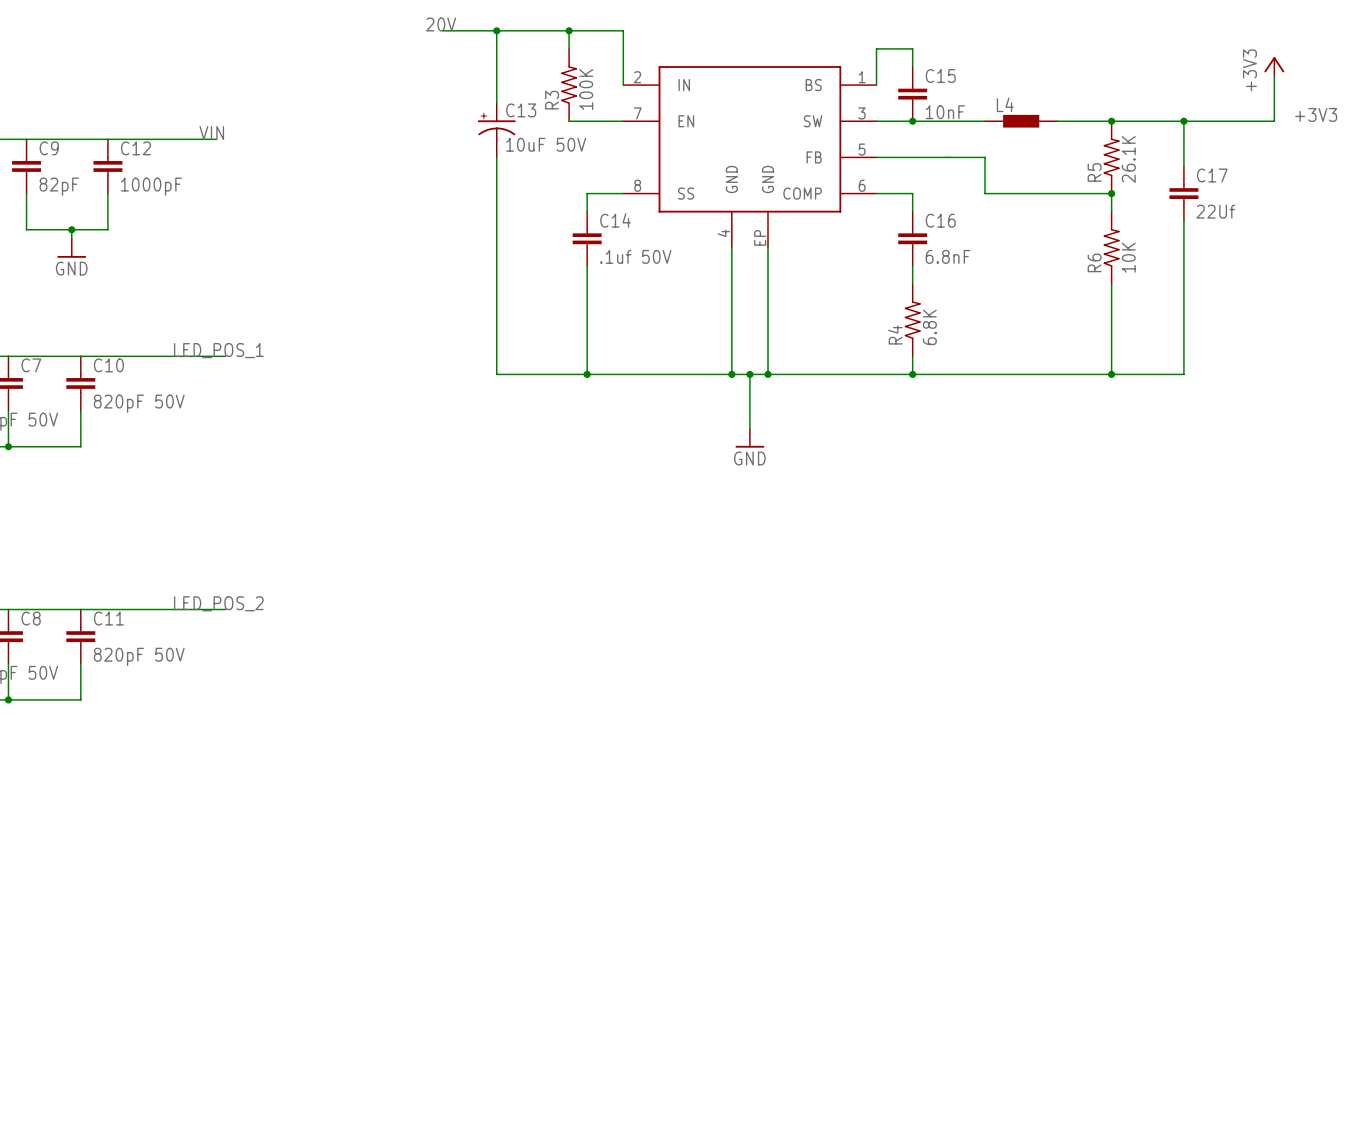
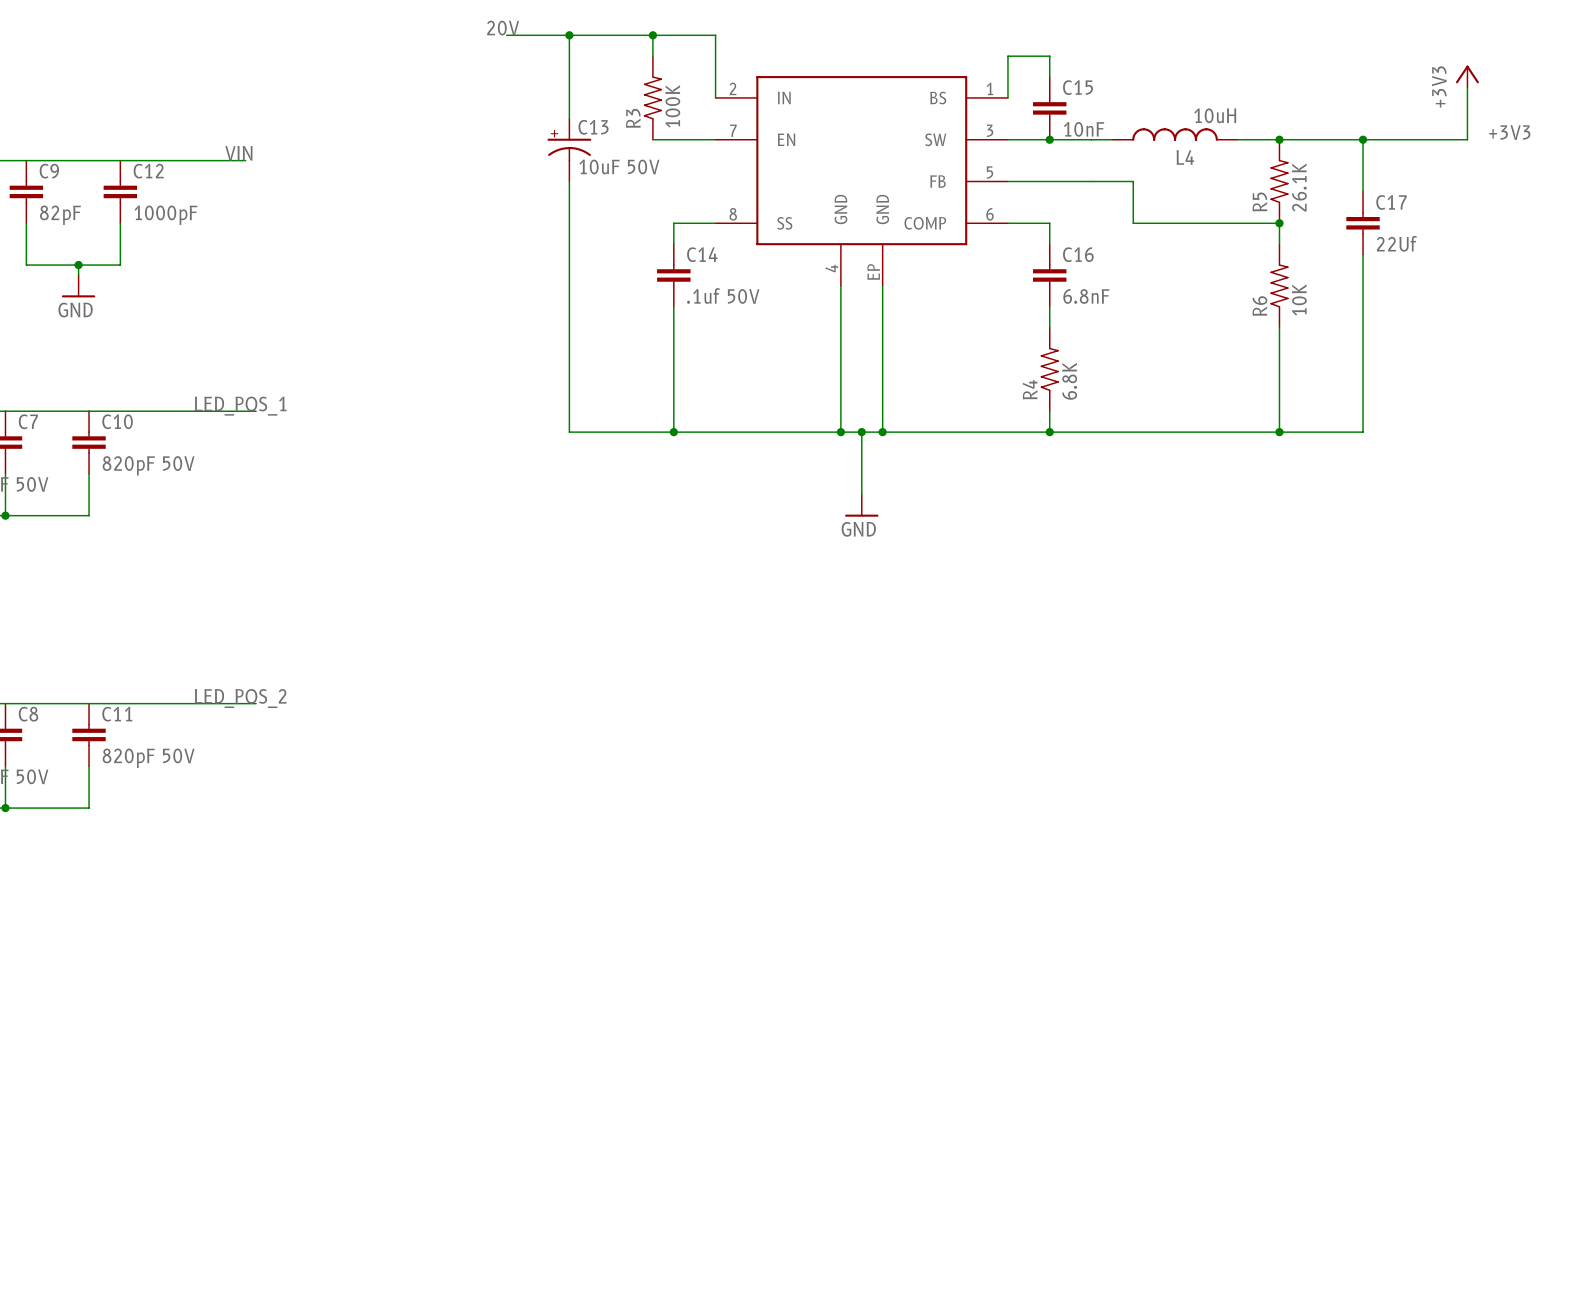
L4 value: none -> 10uH (1215, 115)
L4 name position: L4 (1005, 104) -> L4 (1185, 157)
L4 symbol: [985, 114, 1058, 128] -> [1112, 128, 1238, 141]

